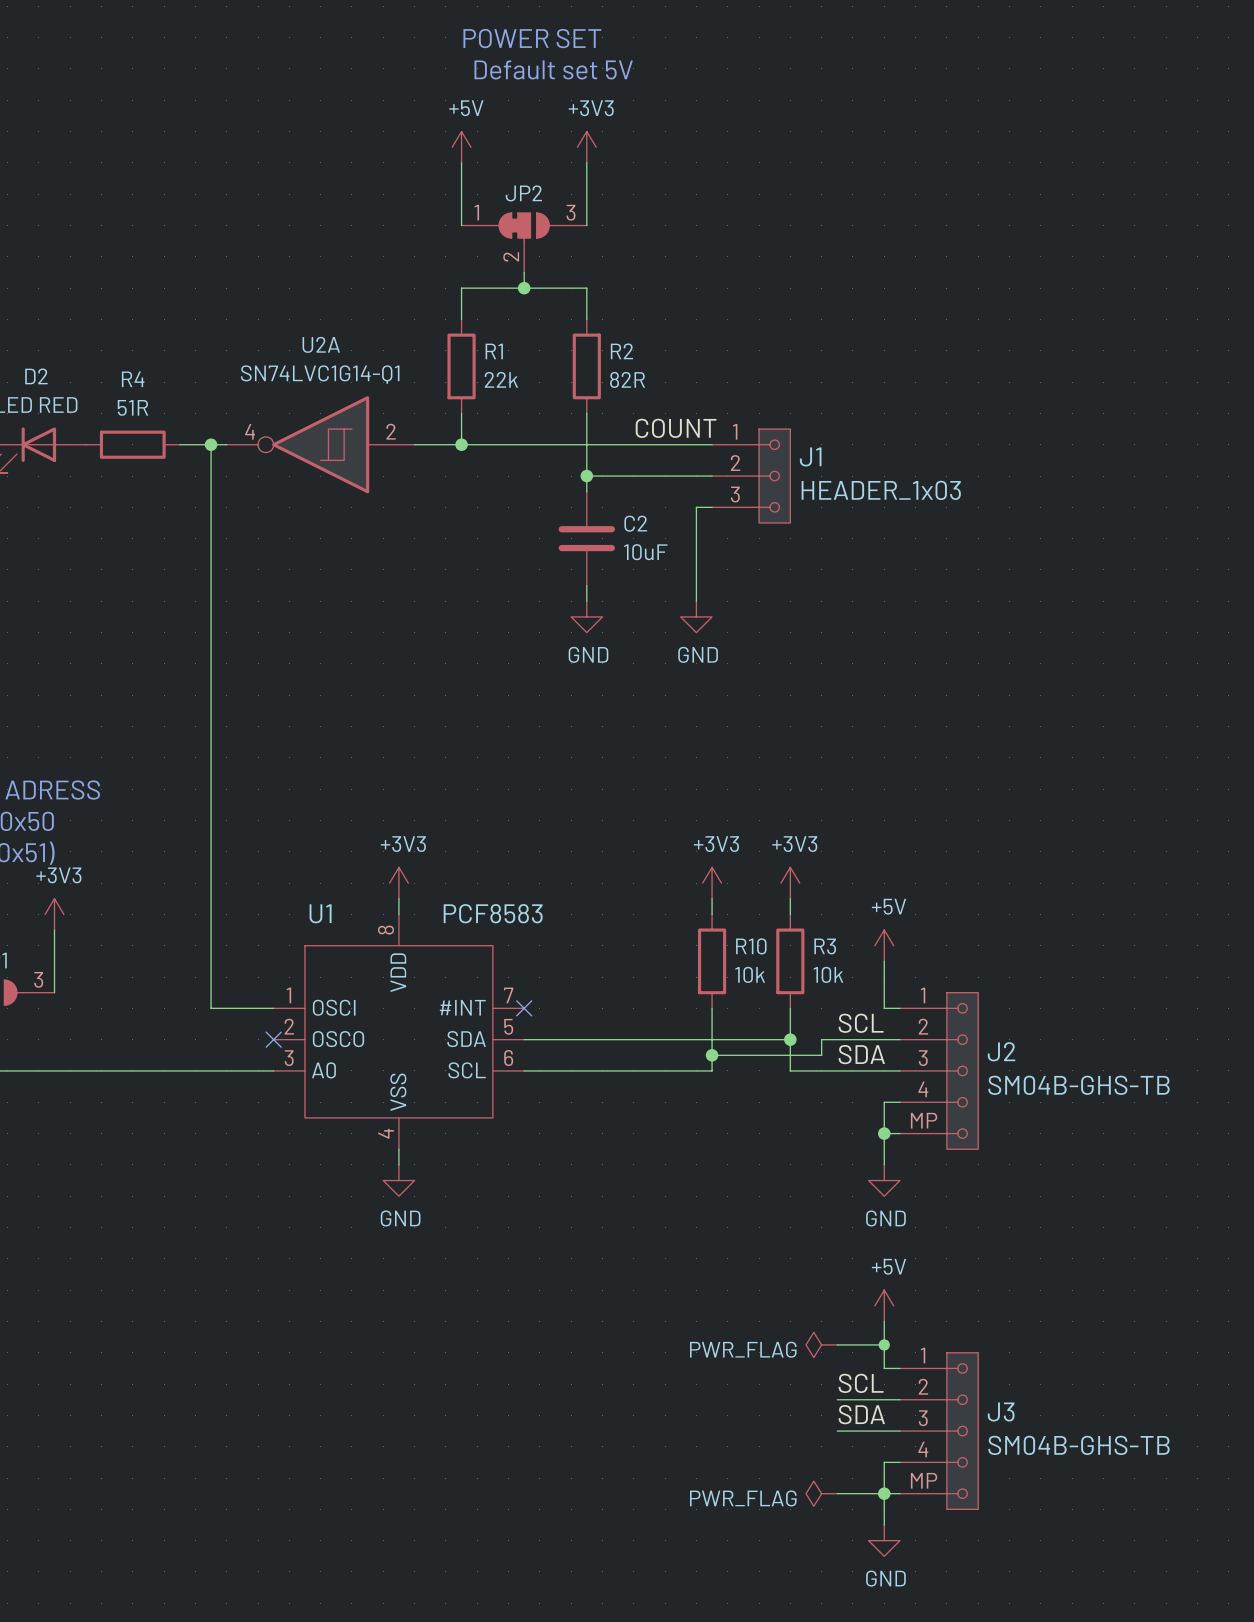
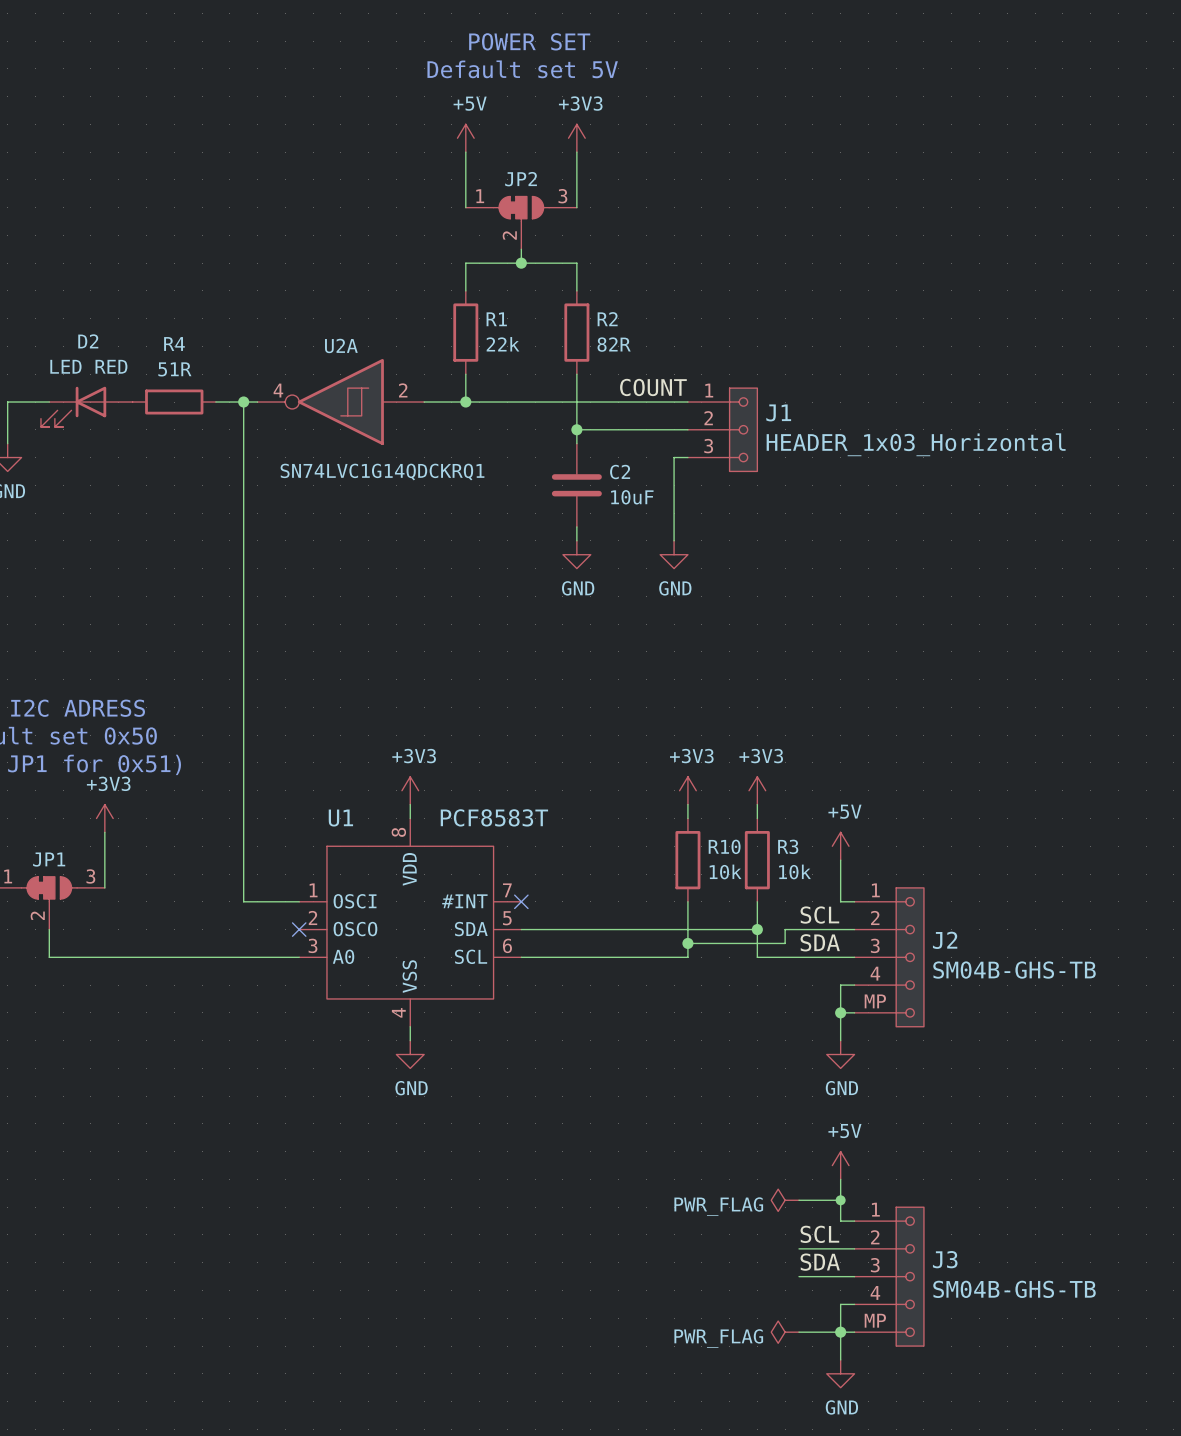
U2A name position: U2A (321, 344) -> U2A (341, 345)
U2A value: SN74LVC1G14-Q1 (320, 374) -> SN74LVC1G14QDCKRQ1 (382, 472)
J1 value: HEADER_1x03 (881, 490) -> HEADER_1x03_Horizontal (916, 444)
U1 value: PCF8583 (493, 913) -> PCF8583T (494, 817)

